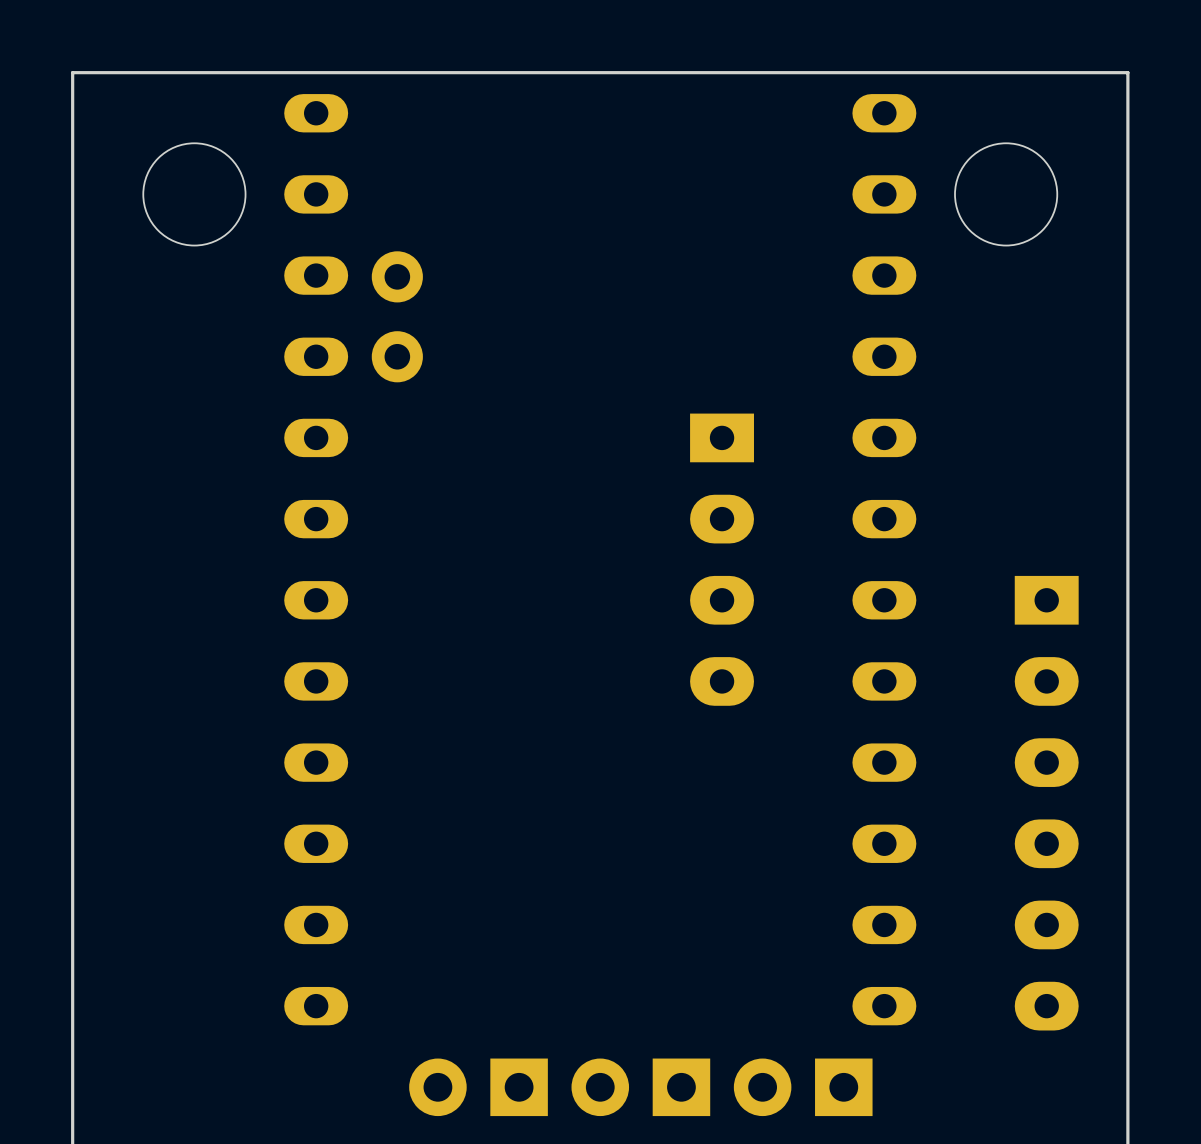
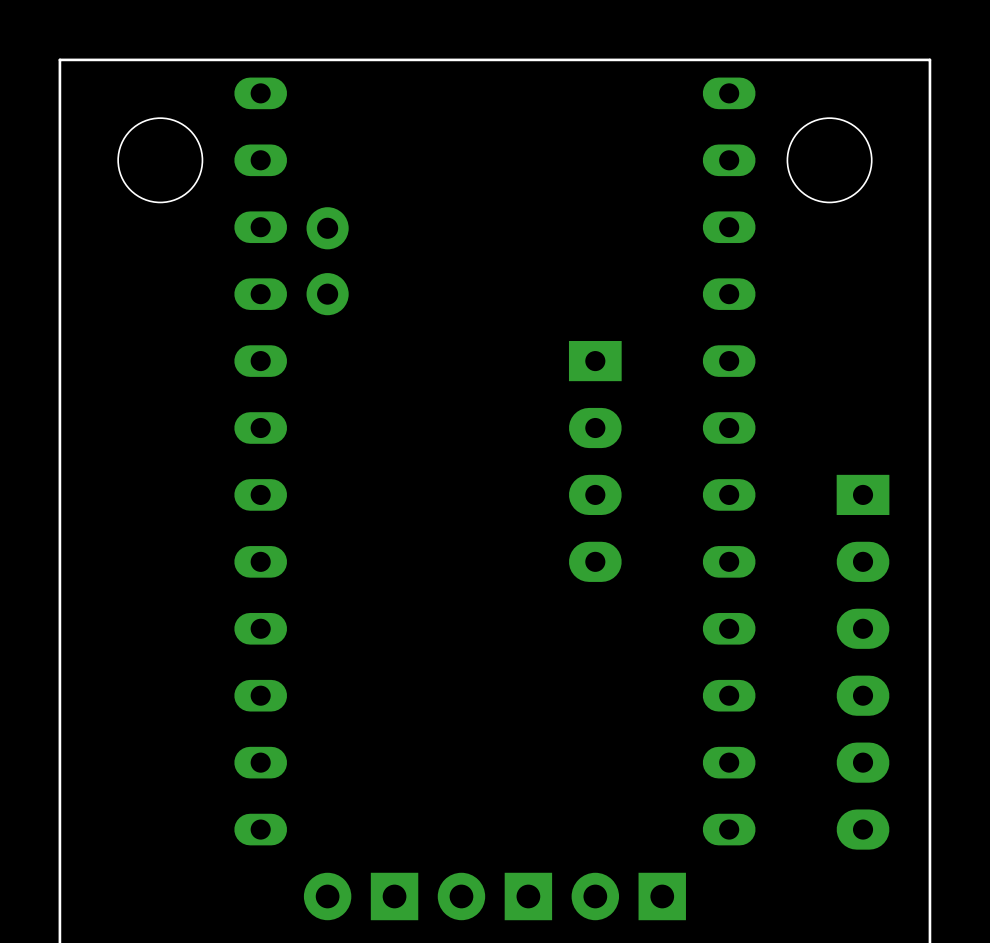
part position: (478, 1087) -> (361, 896)
part position: (640, 1087) -> (494, 896)
part position: (803, 1087) -> (628, 896)

